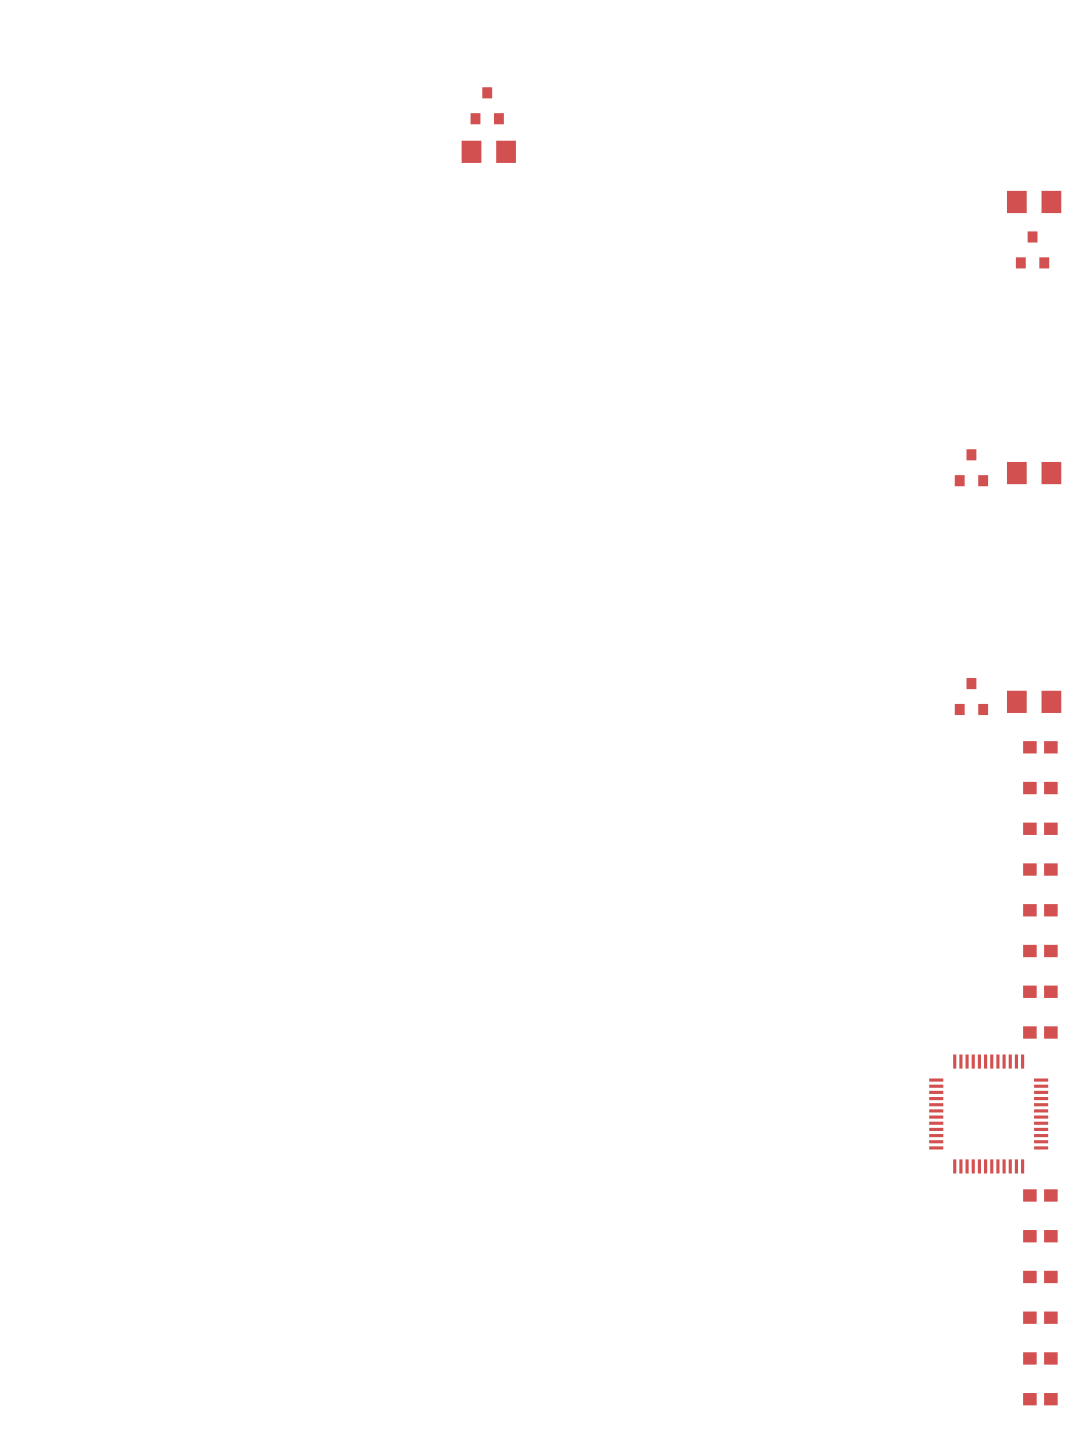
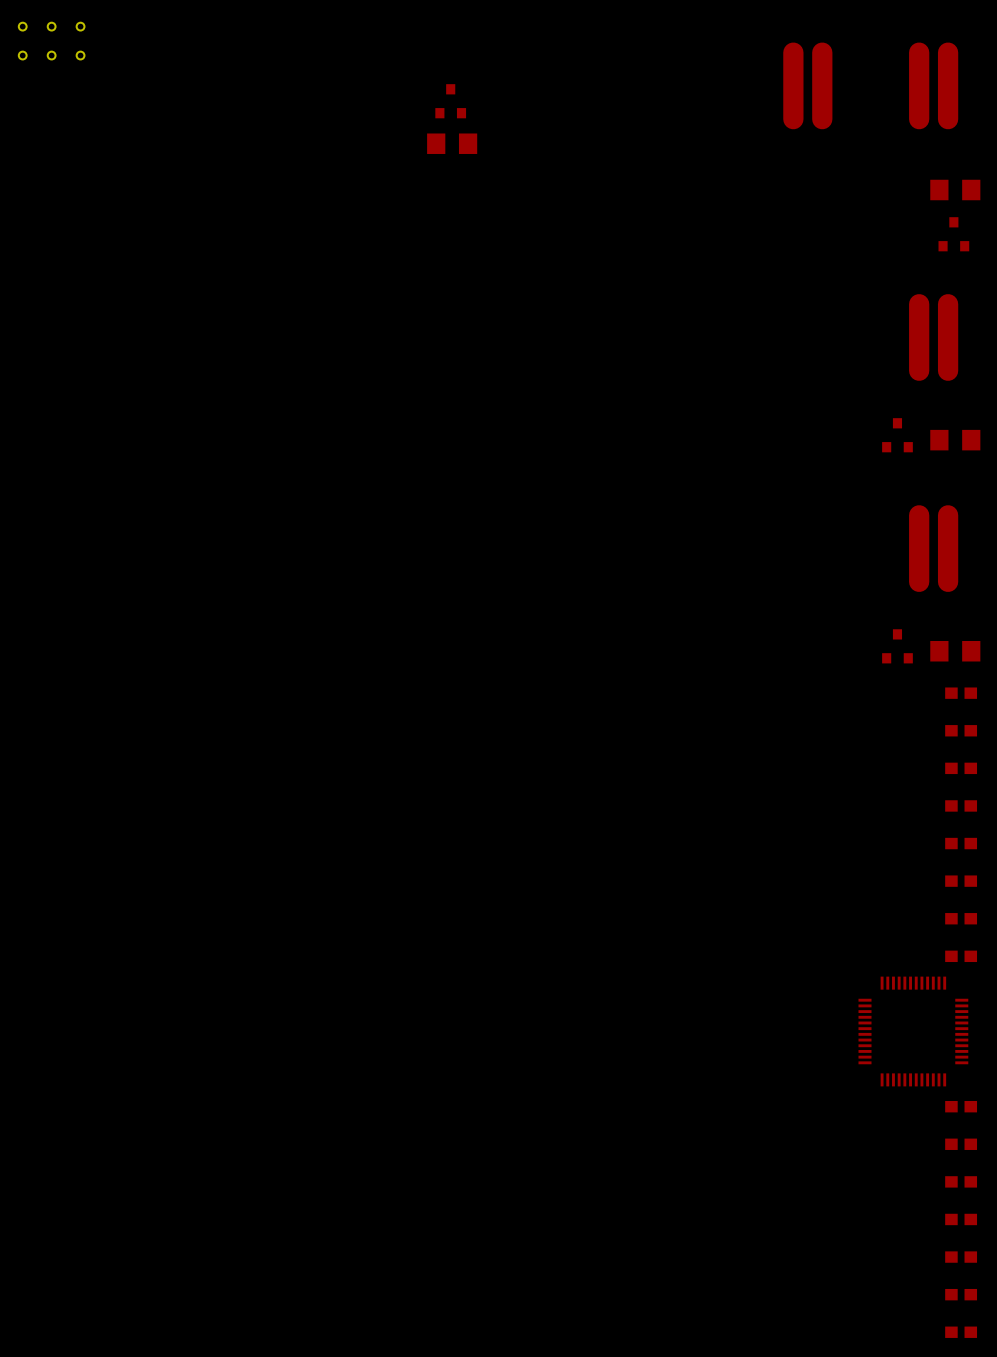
part: none -> (51, 41)
part: none -> (807, 85)
part: none -> (933, 85)
part: none -> (933, 337)
part: none -> (933, 548)

